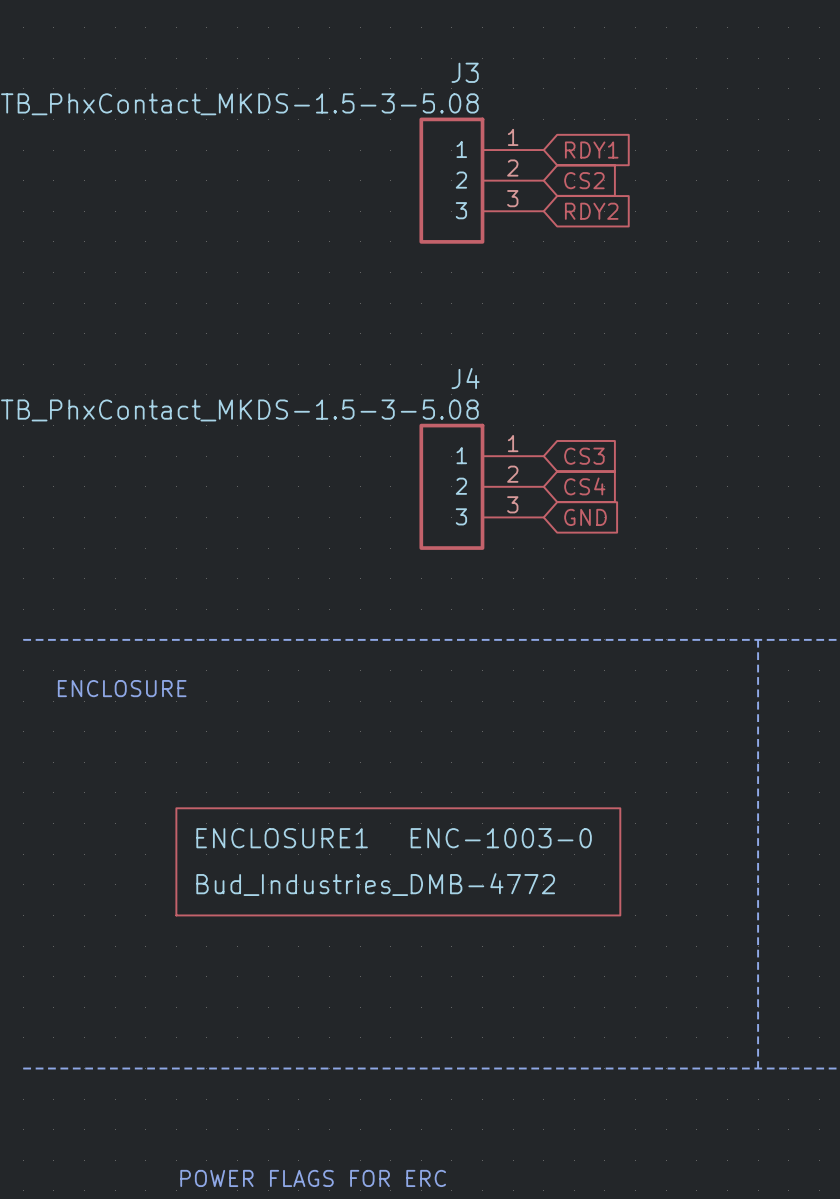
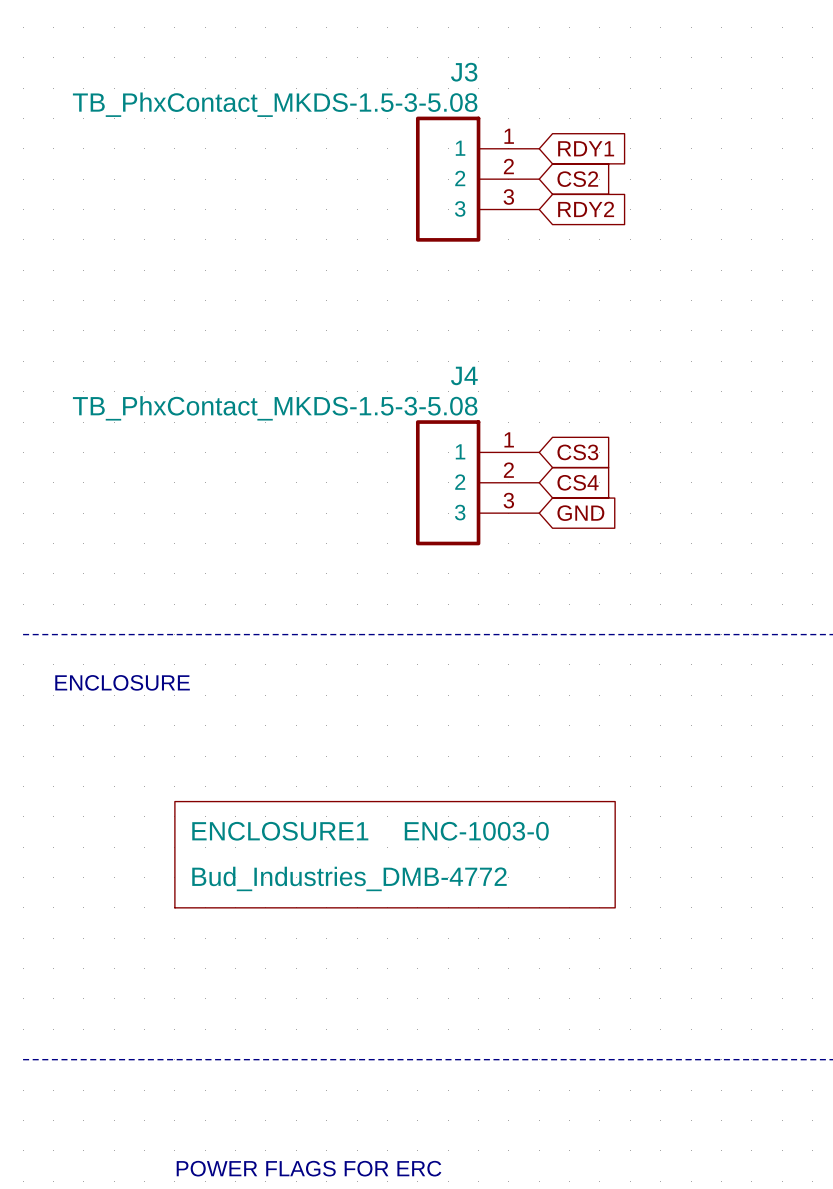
line: (758, 639) (758, 1068) -> none

